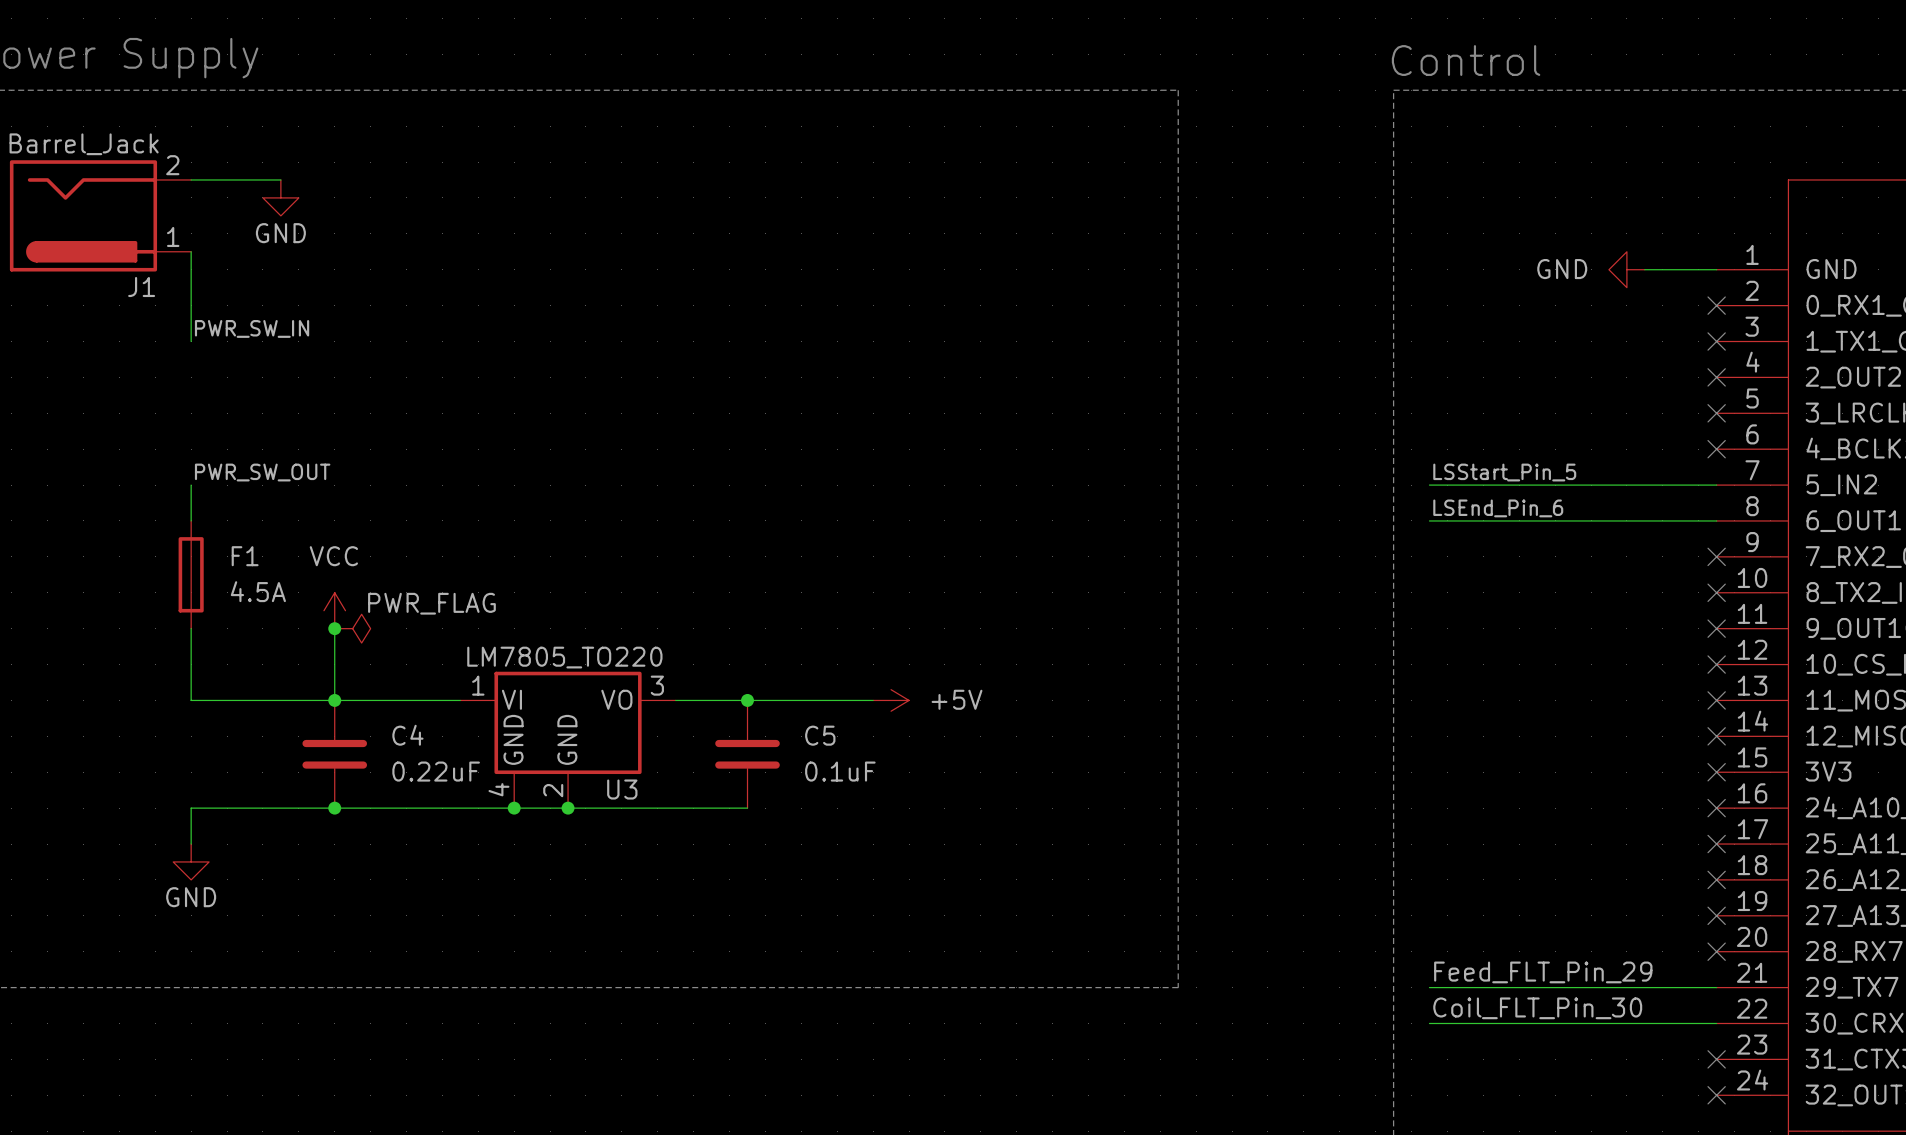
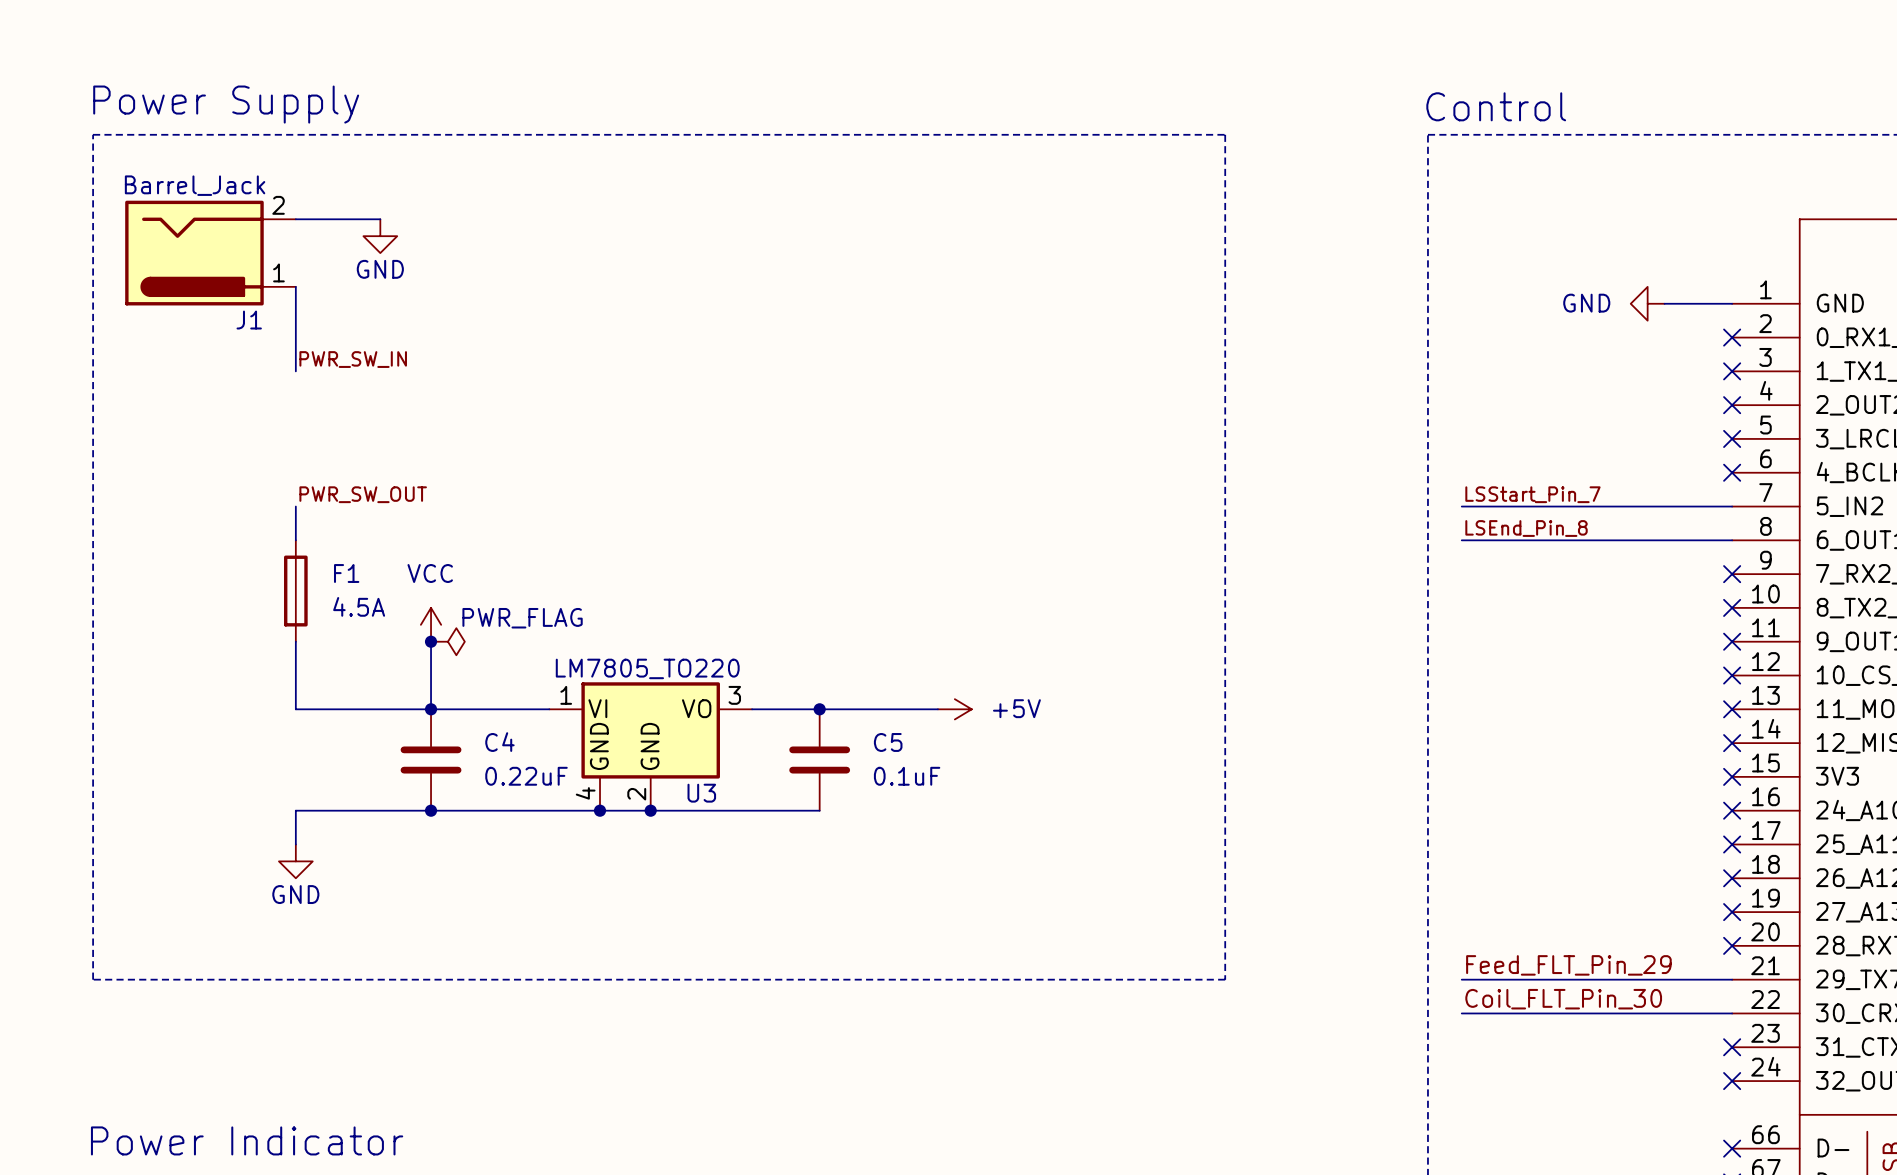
label: LSStart_Pin_5 (1504, 472) -> LSStart_Pin_7 (1532, 494)
label: LSEnd_Pin_6 (1498, 508) -> LSEnd_Pin_8 (1526, 528)

